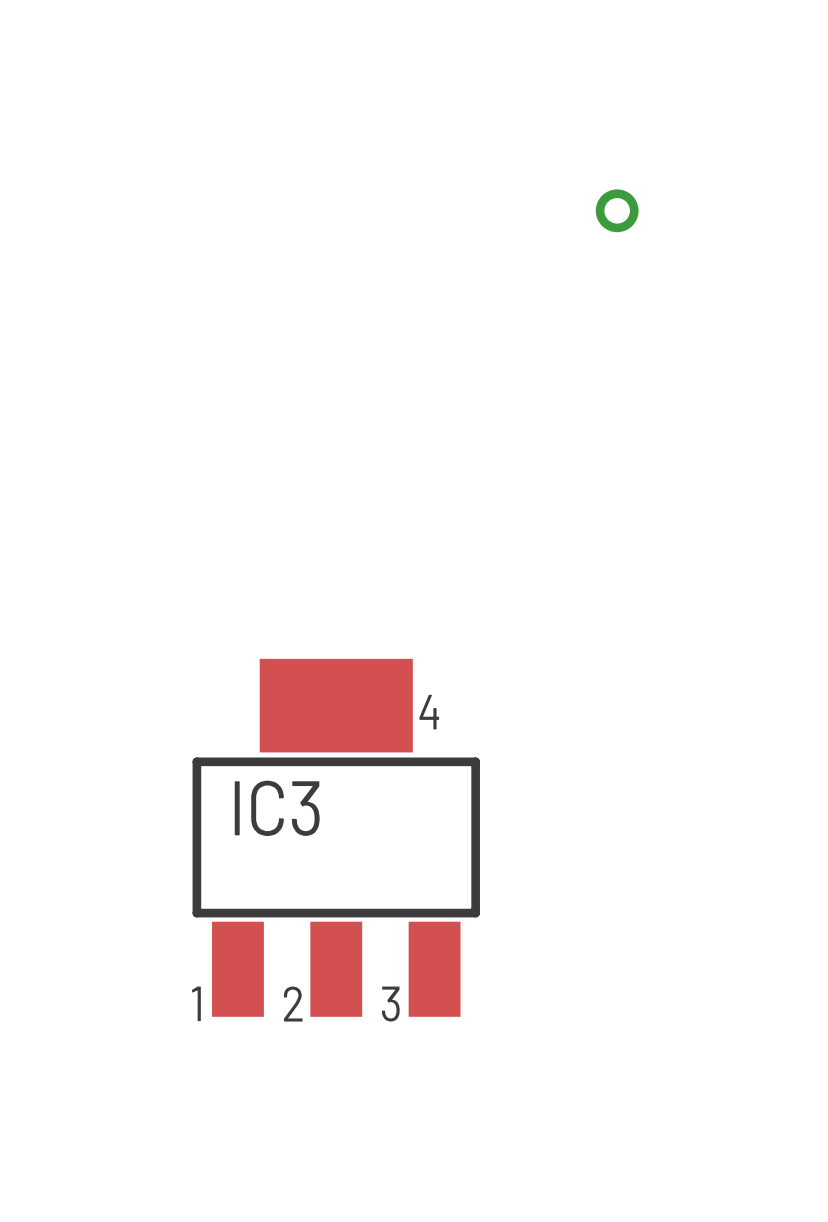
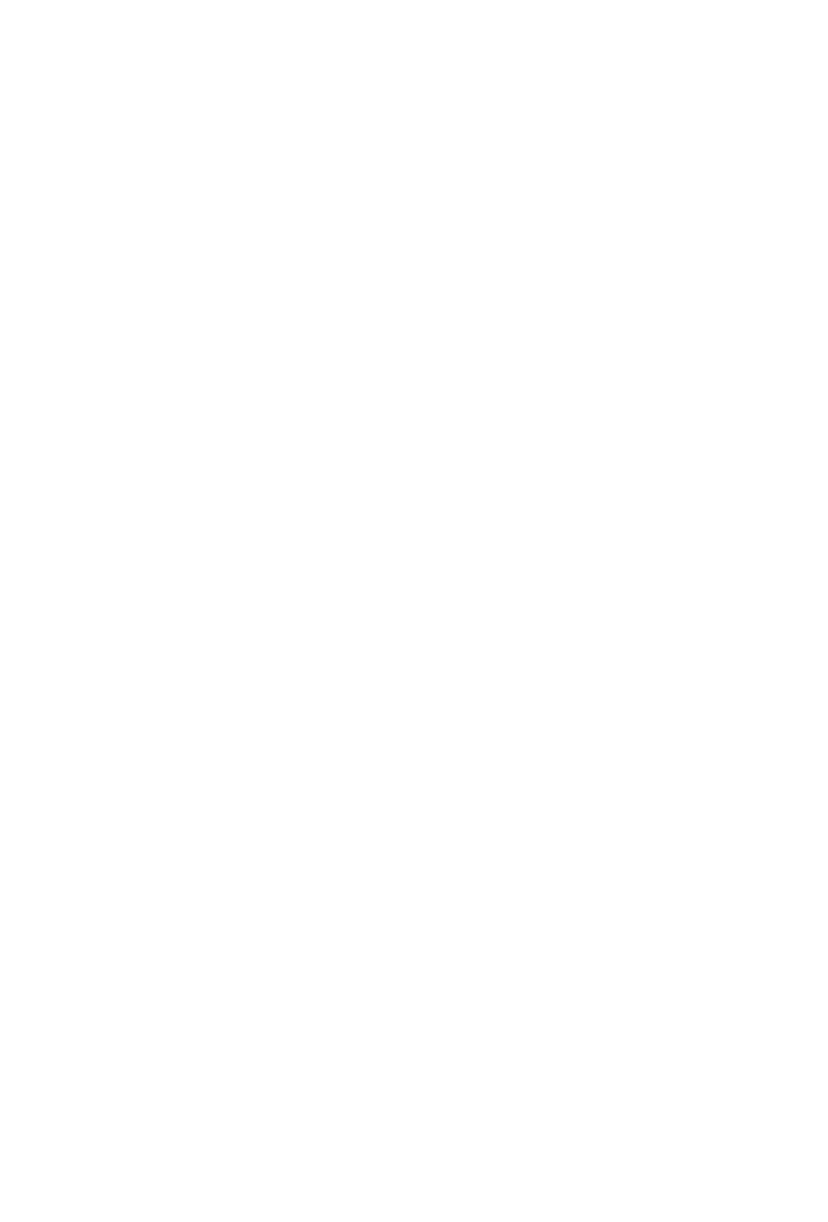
via: (617, 210) -> none
IC3: (336, 837) -> none

